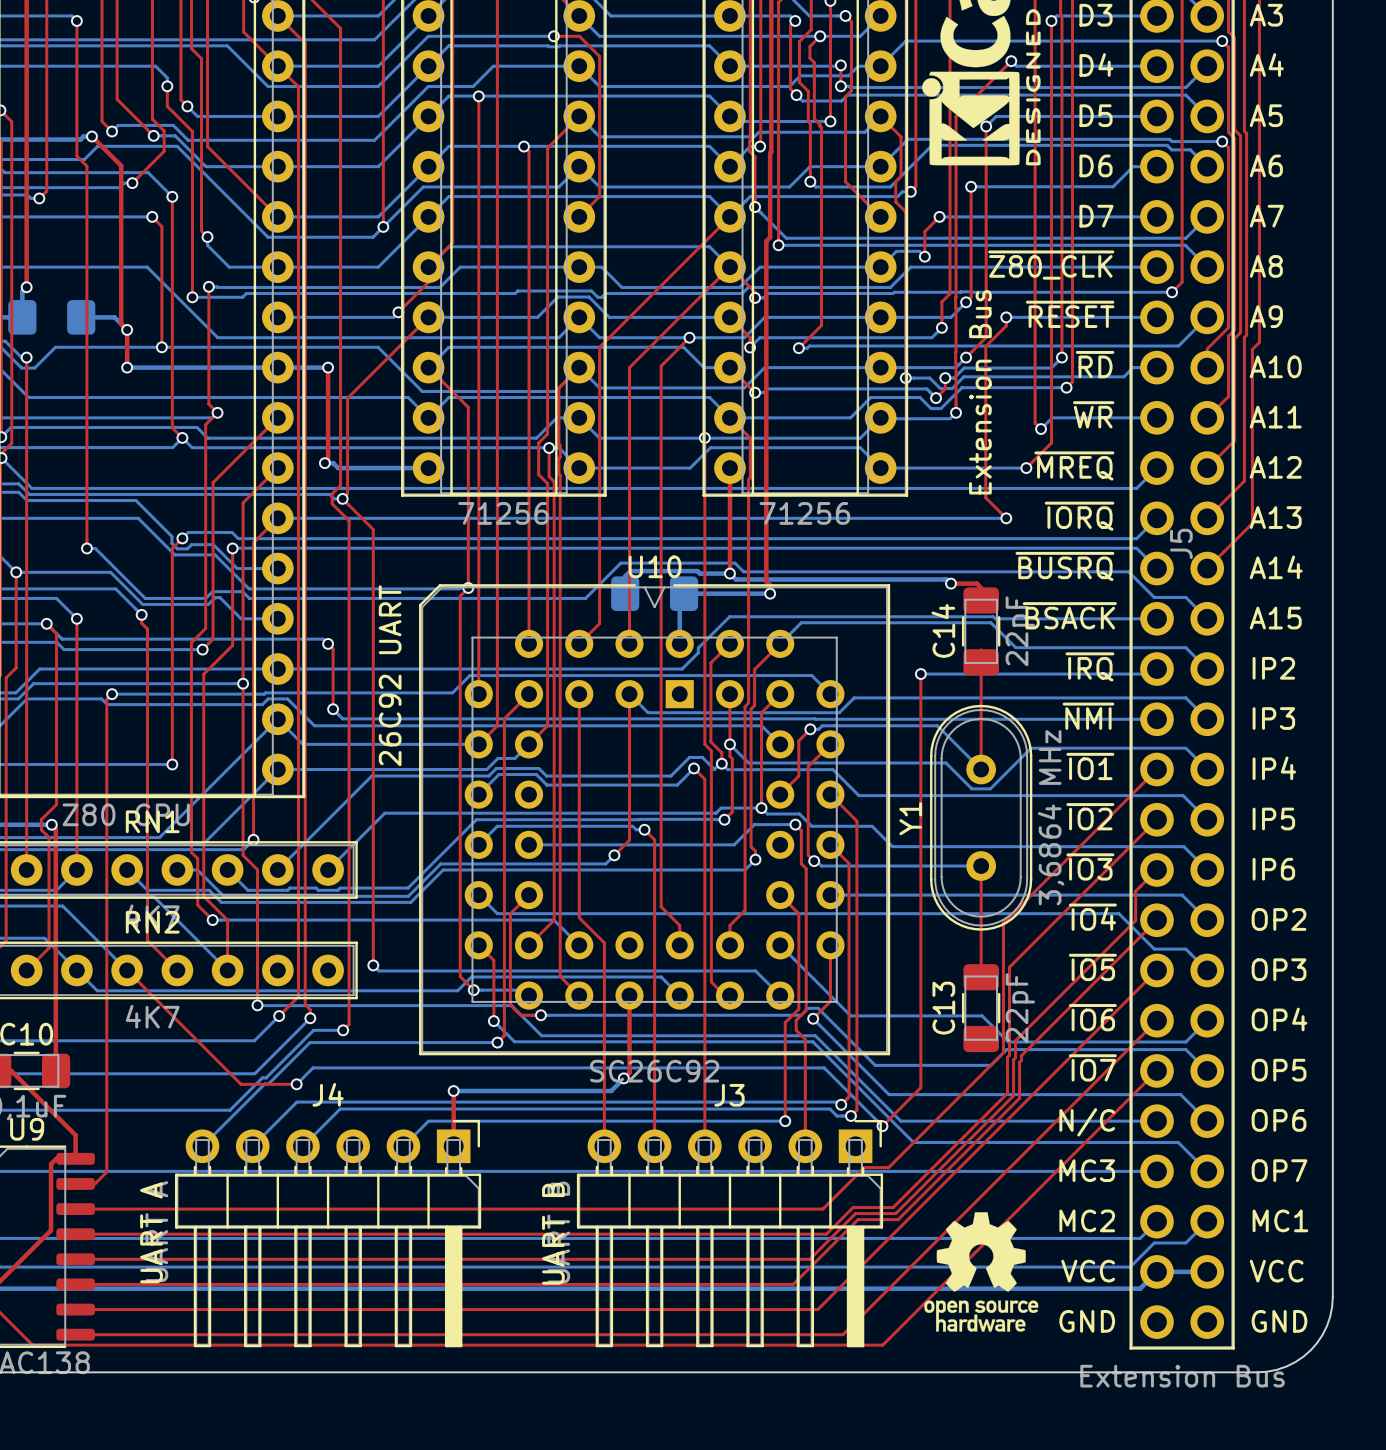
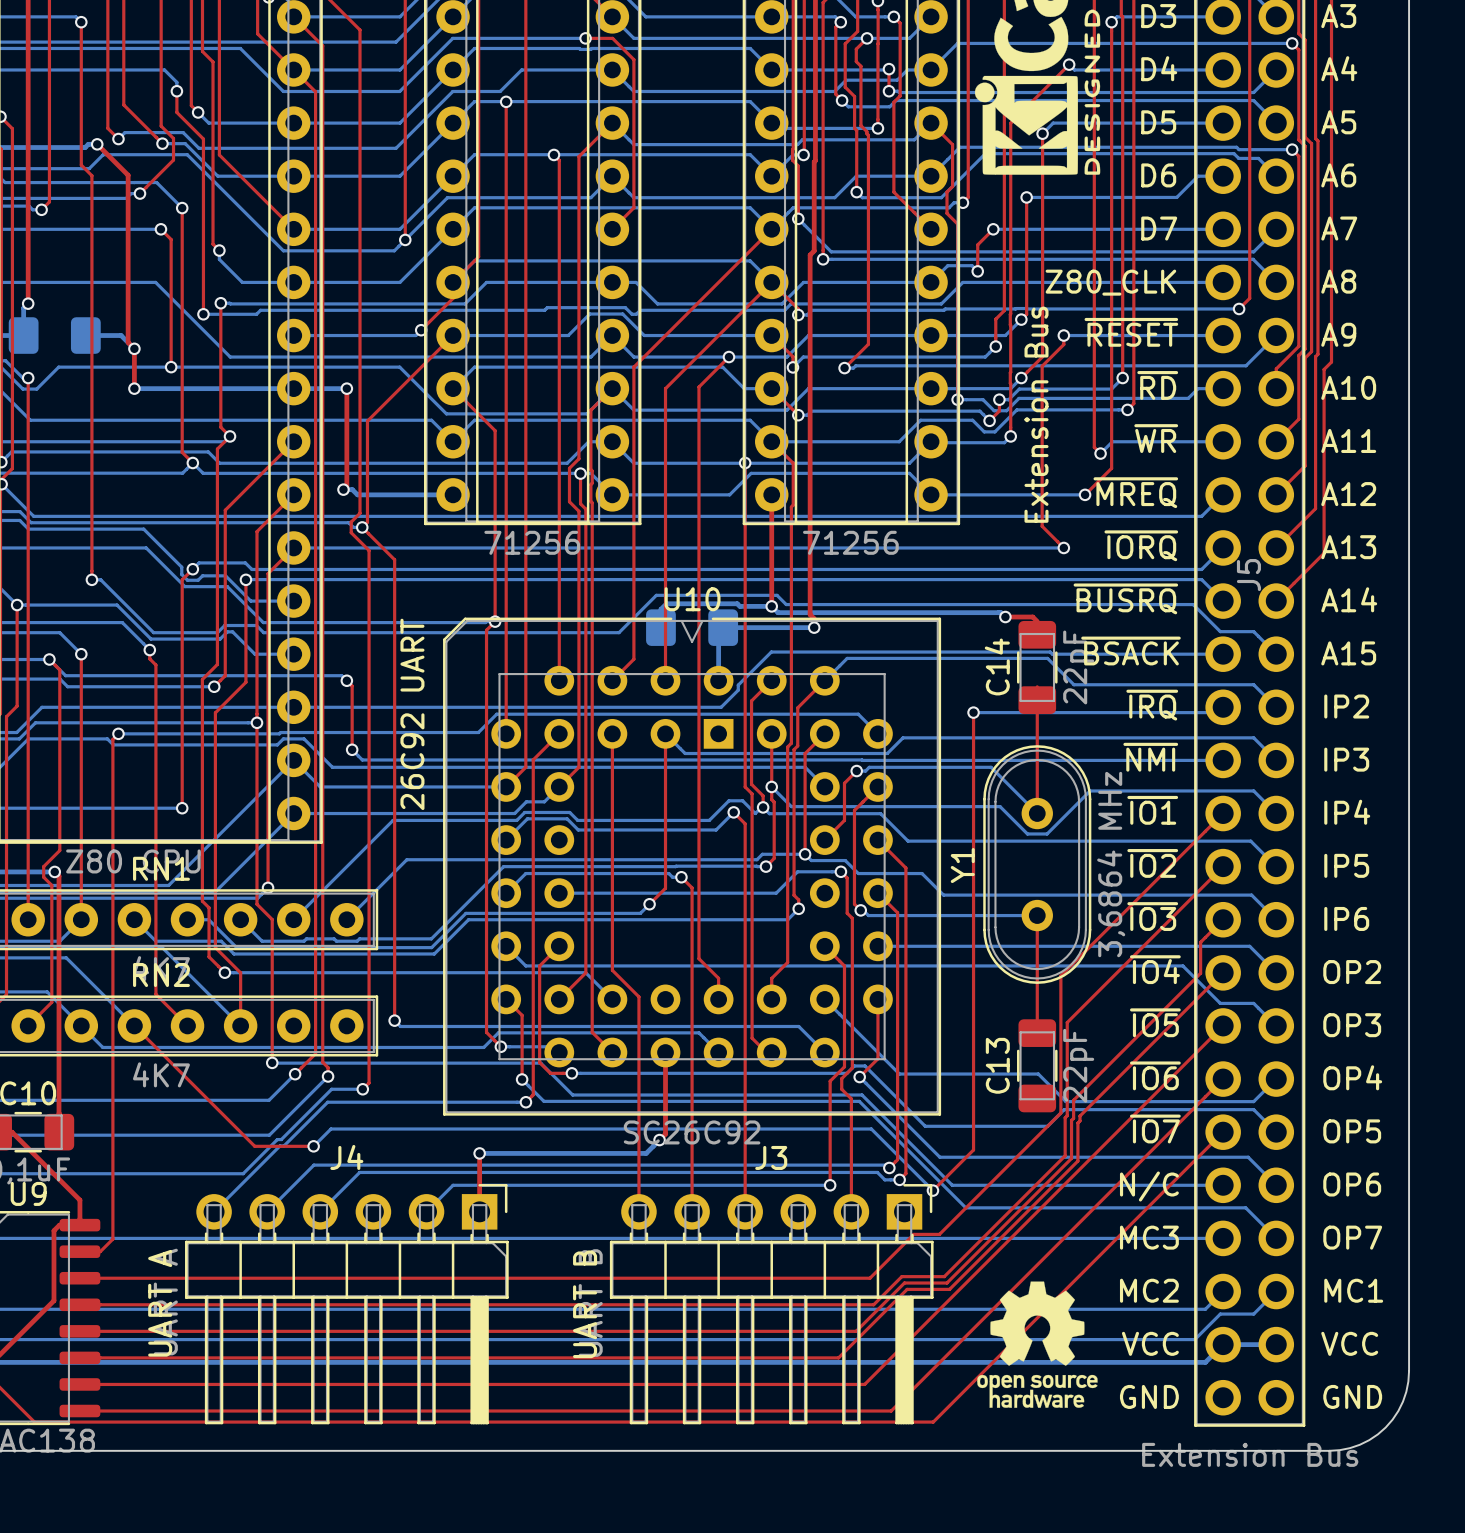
text: ~{Z80_CLK} (1051, 265) -> Z80_CLK (1110, 282)

